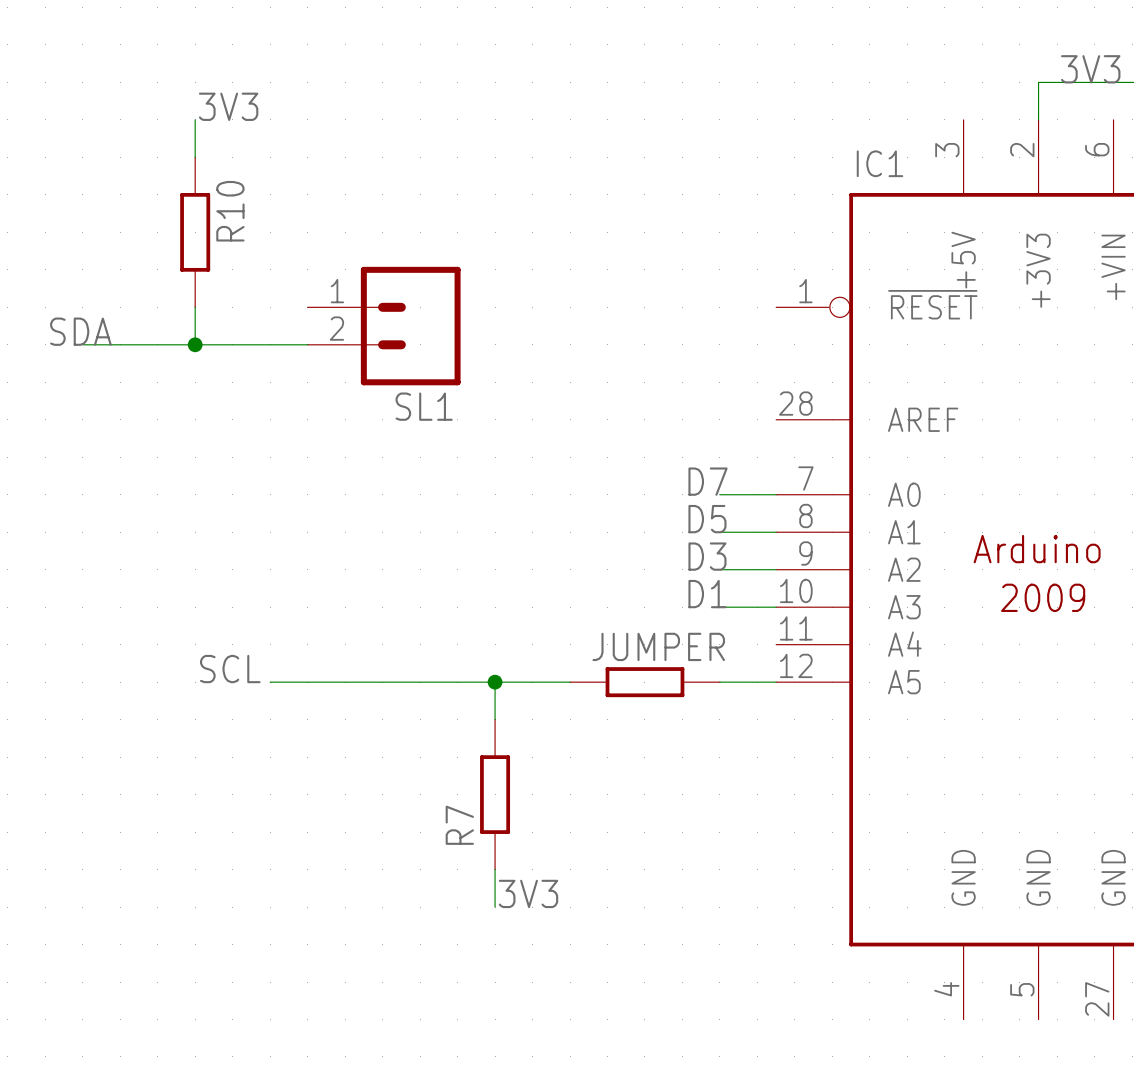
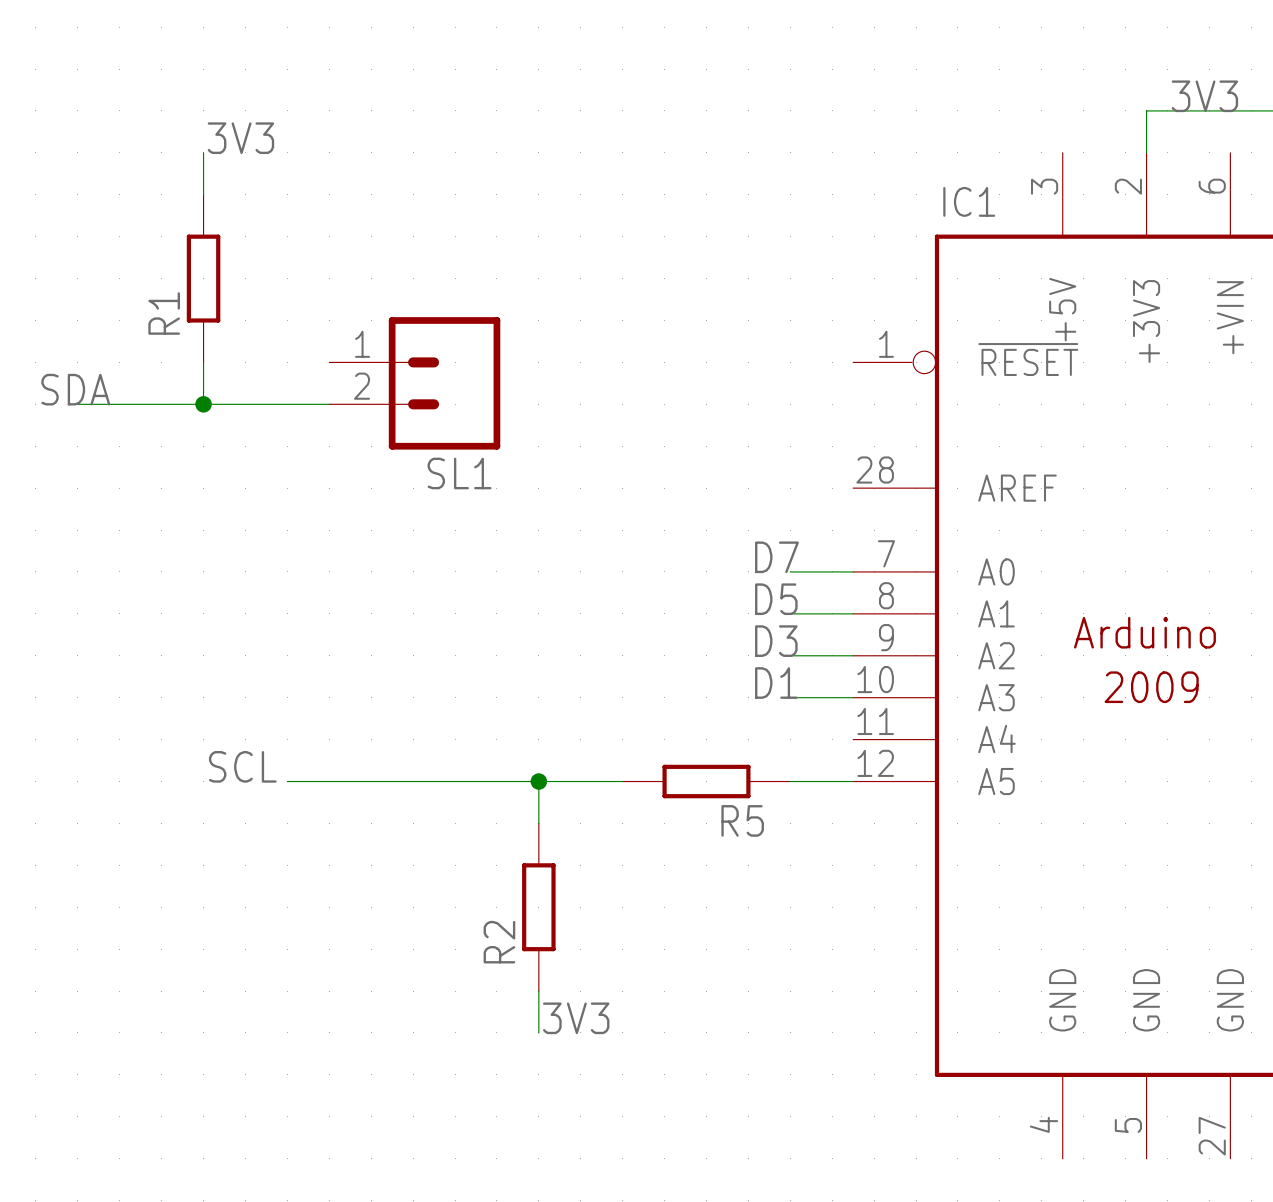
R10 name: R10 (230, 211) -> R1 (164, 313)
JUMPER name: JUMPER (658, 646) -> R5 (742, 820)
R7 name: R7 (459, 825) -> R2 (499, 942)

